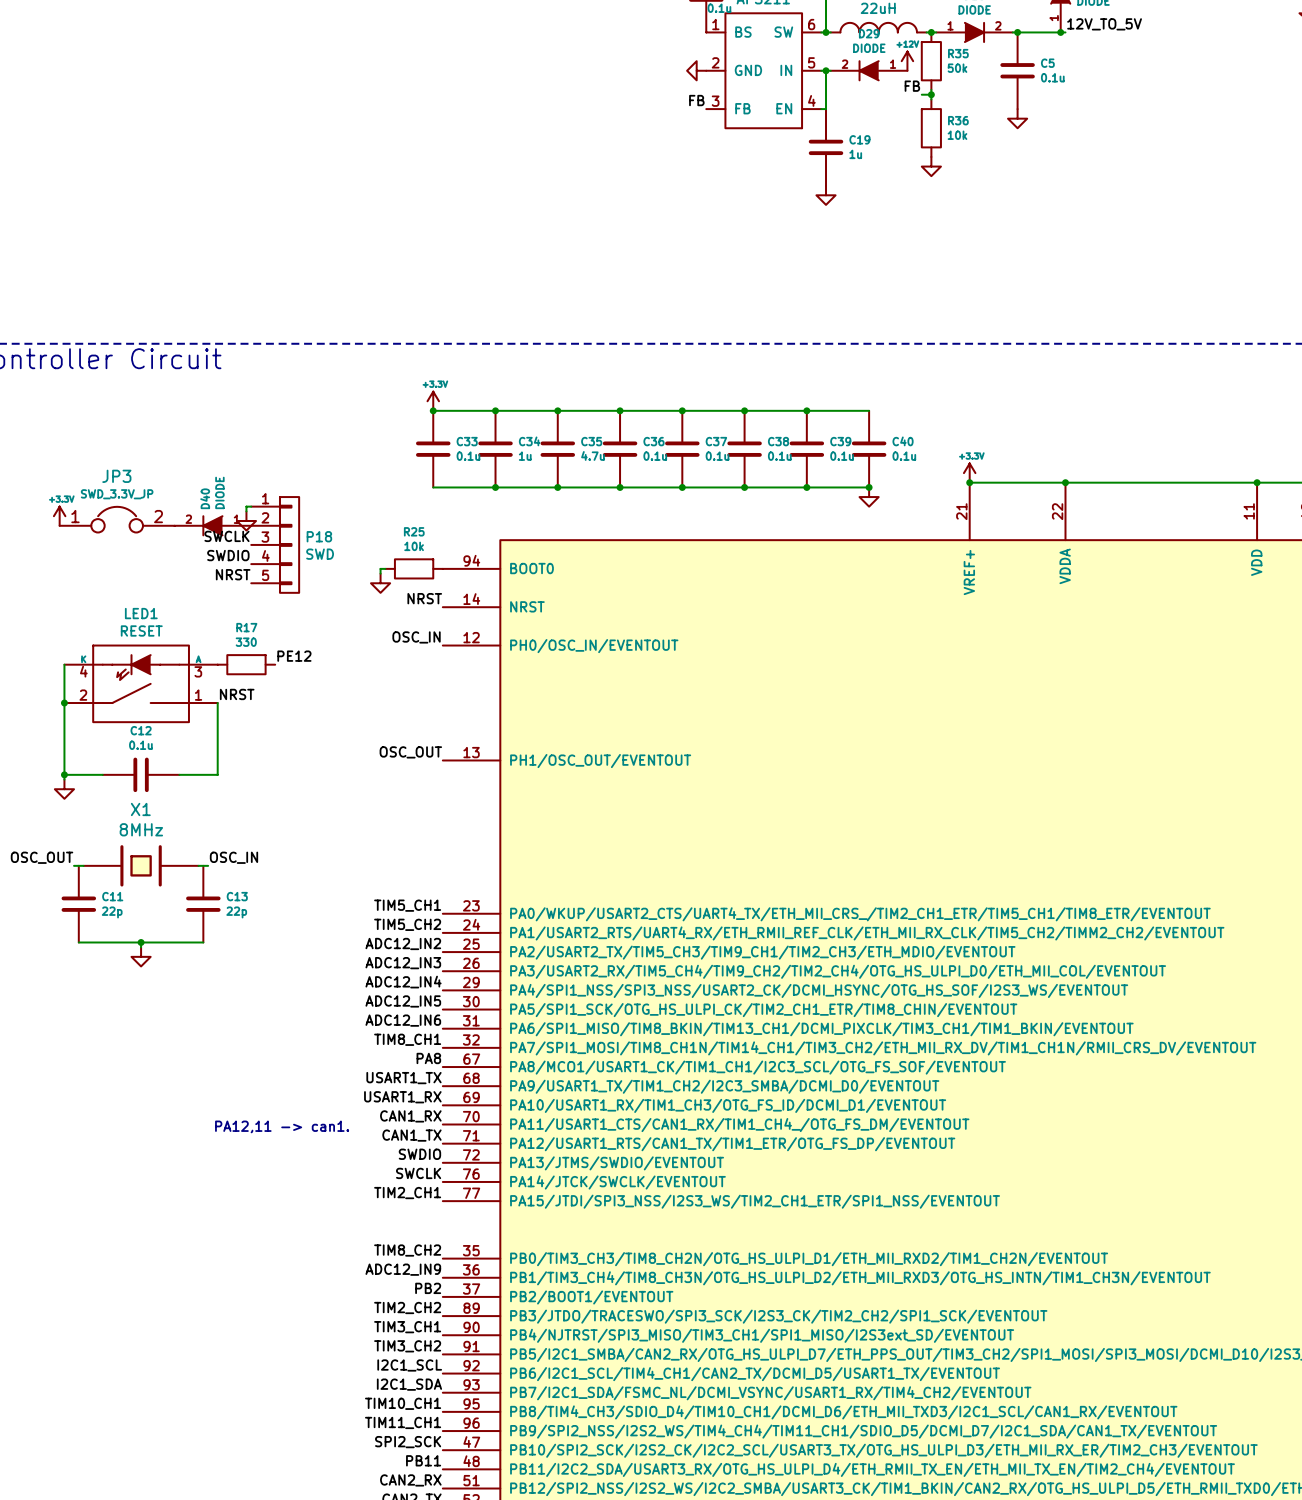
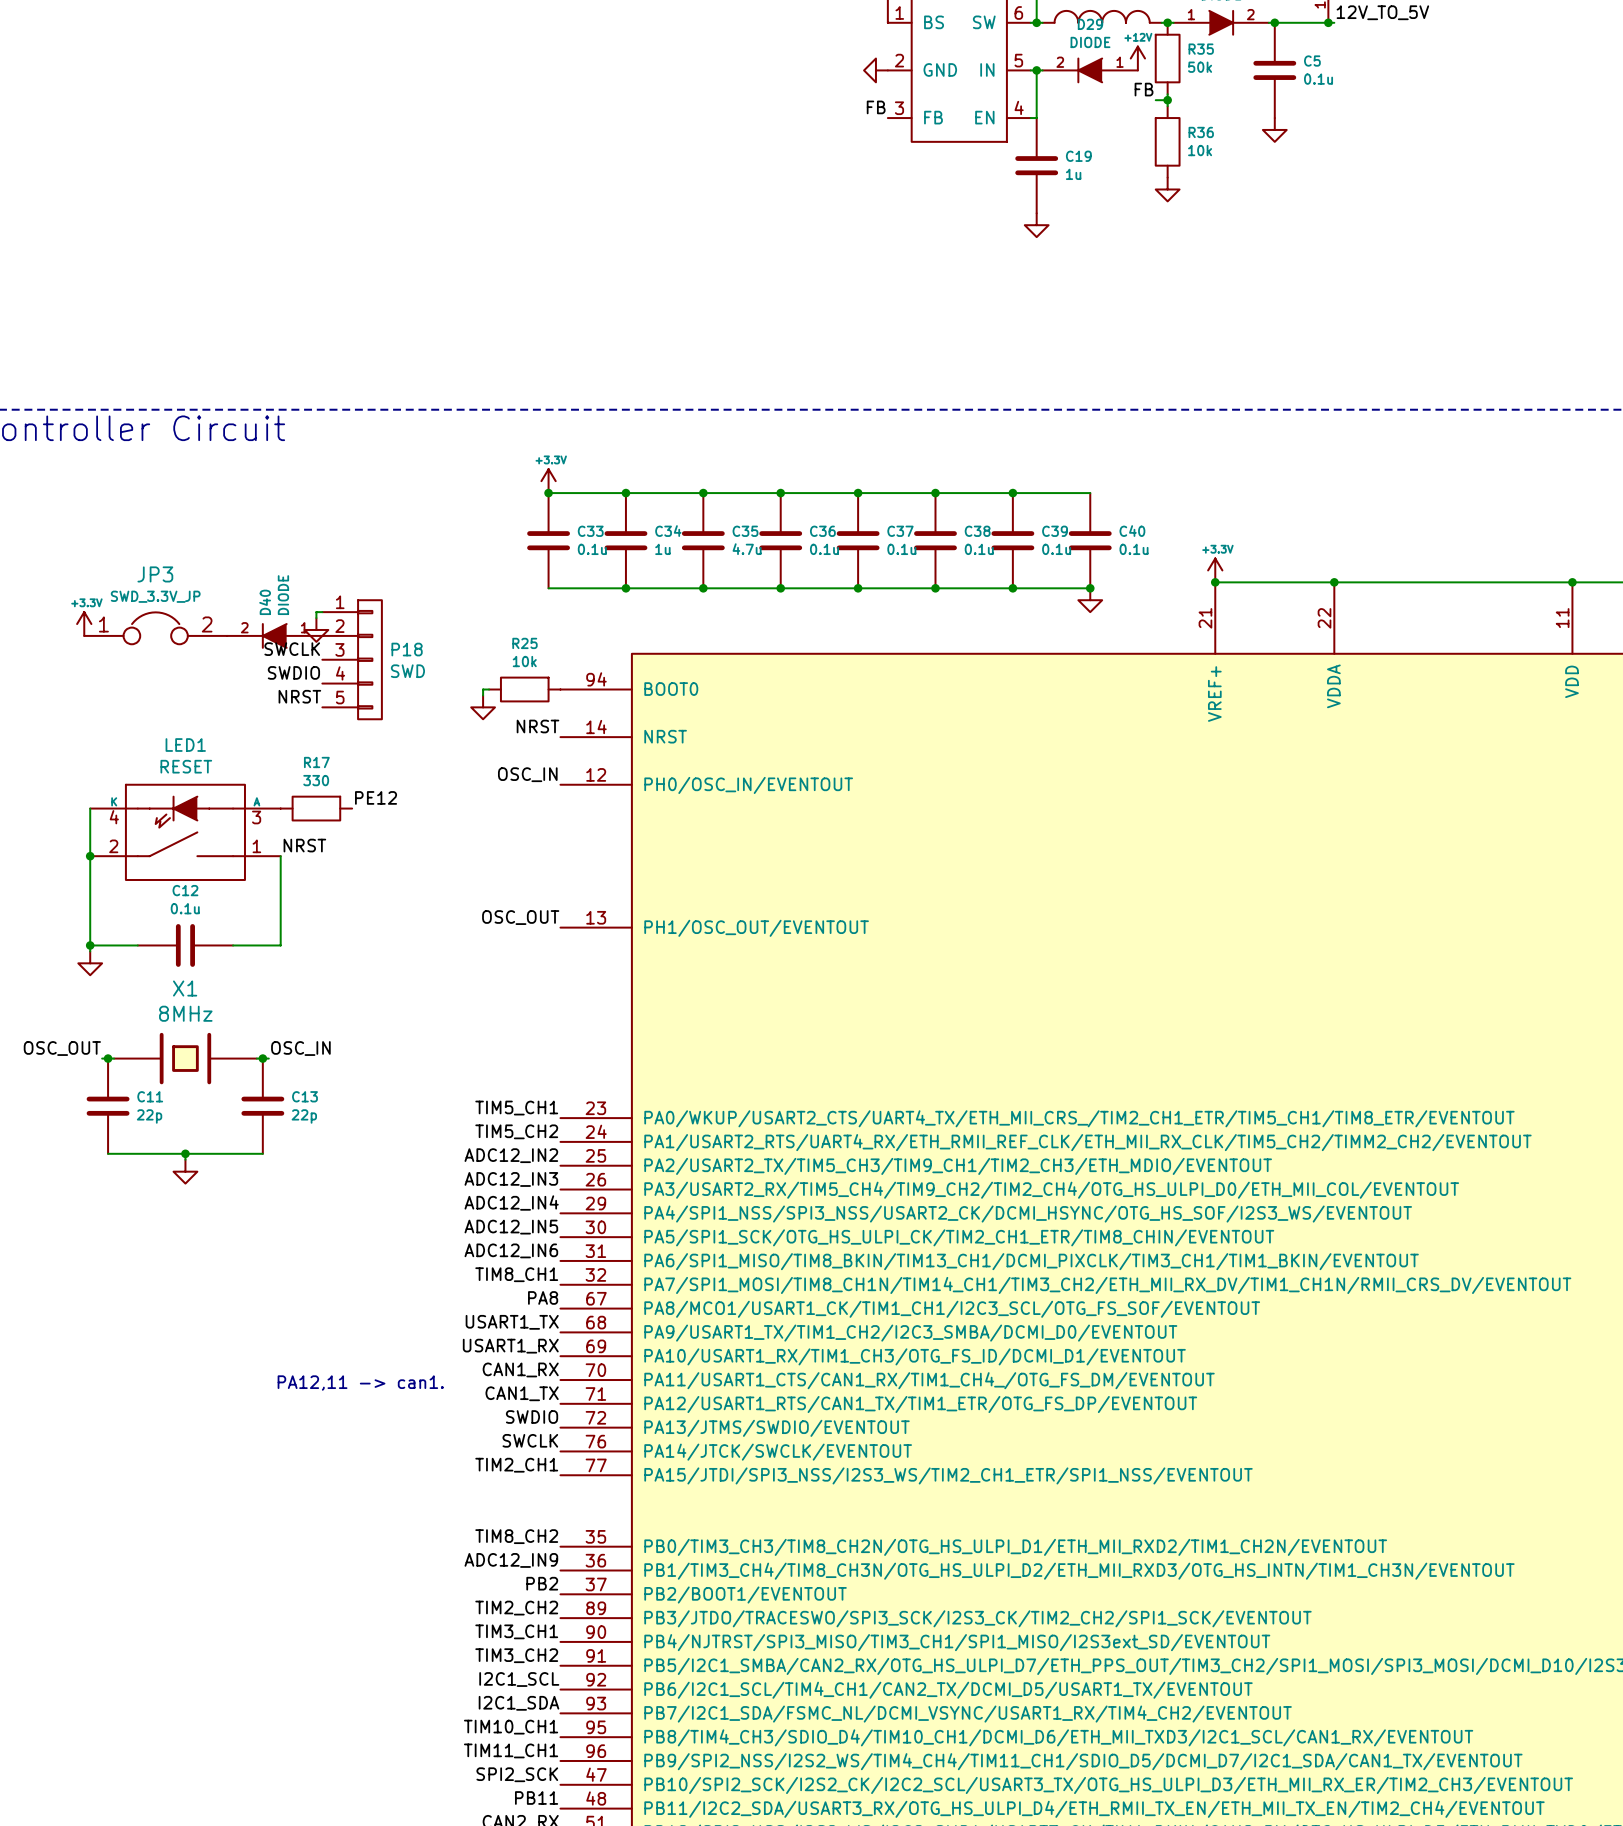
junction: none -> (108, 1058)
junction: none -> (262, 1058)

